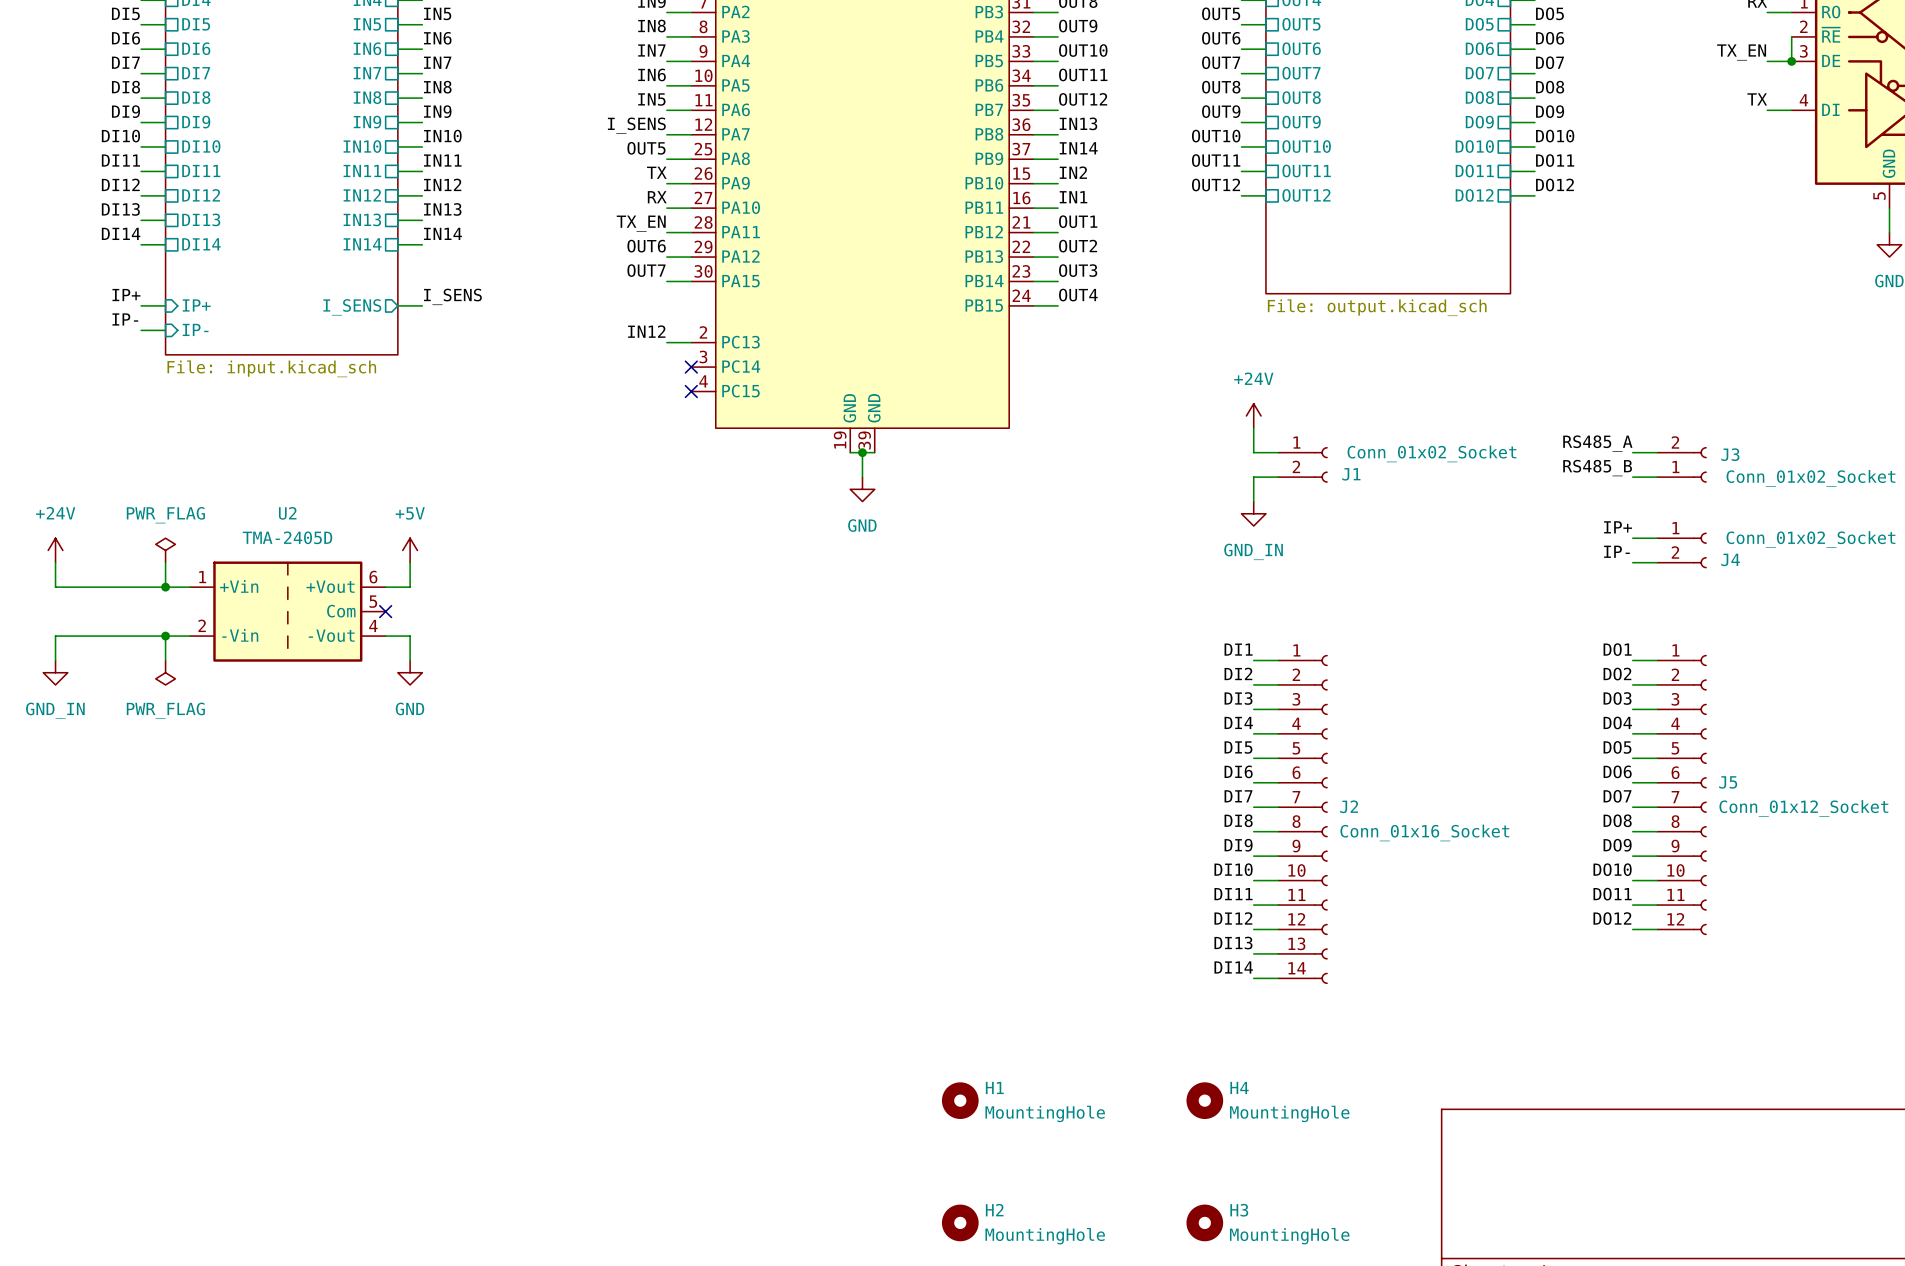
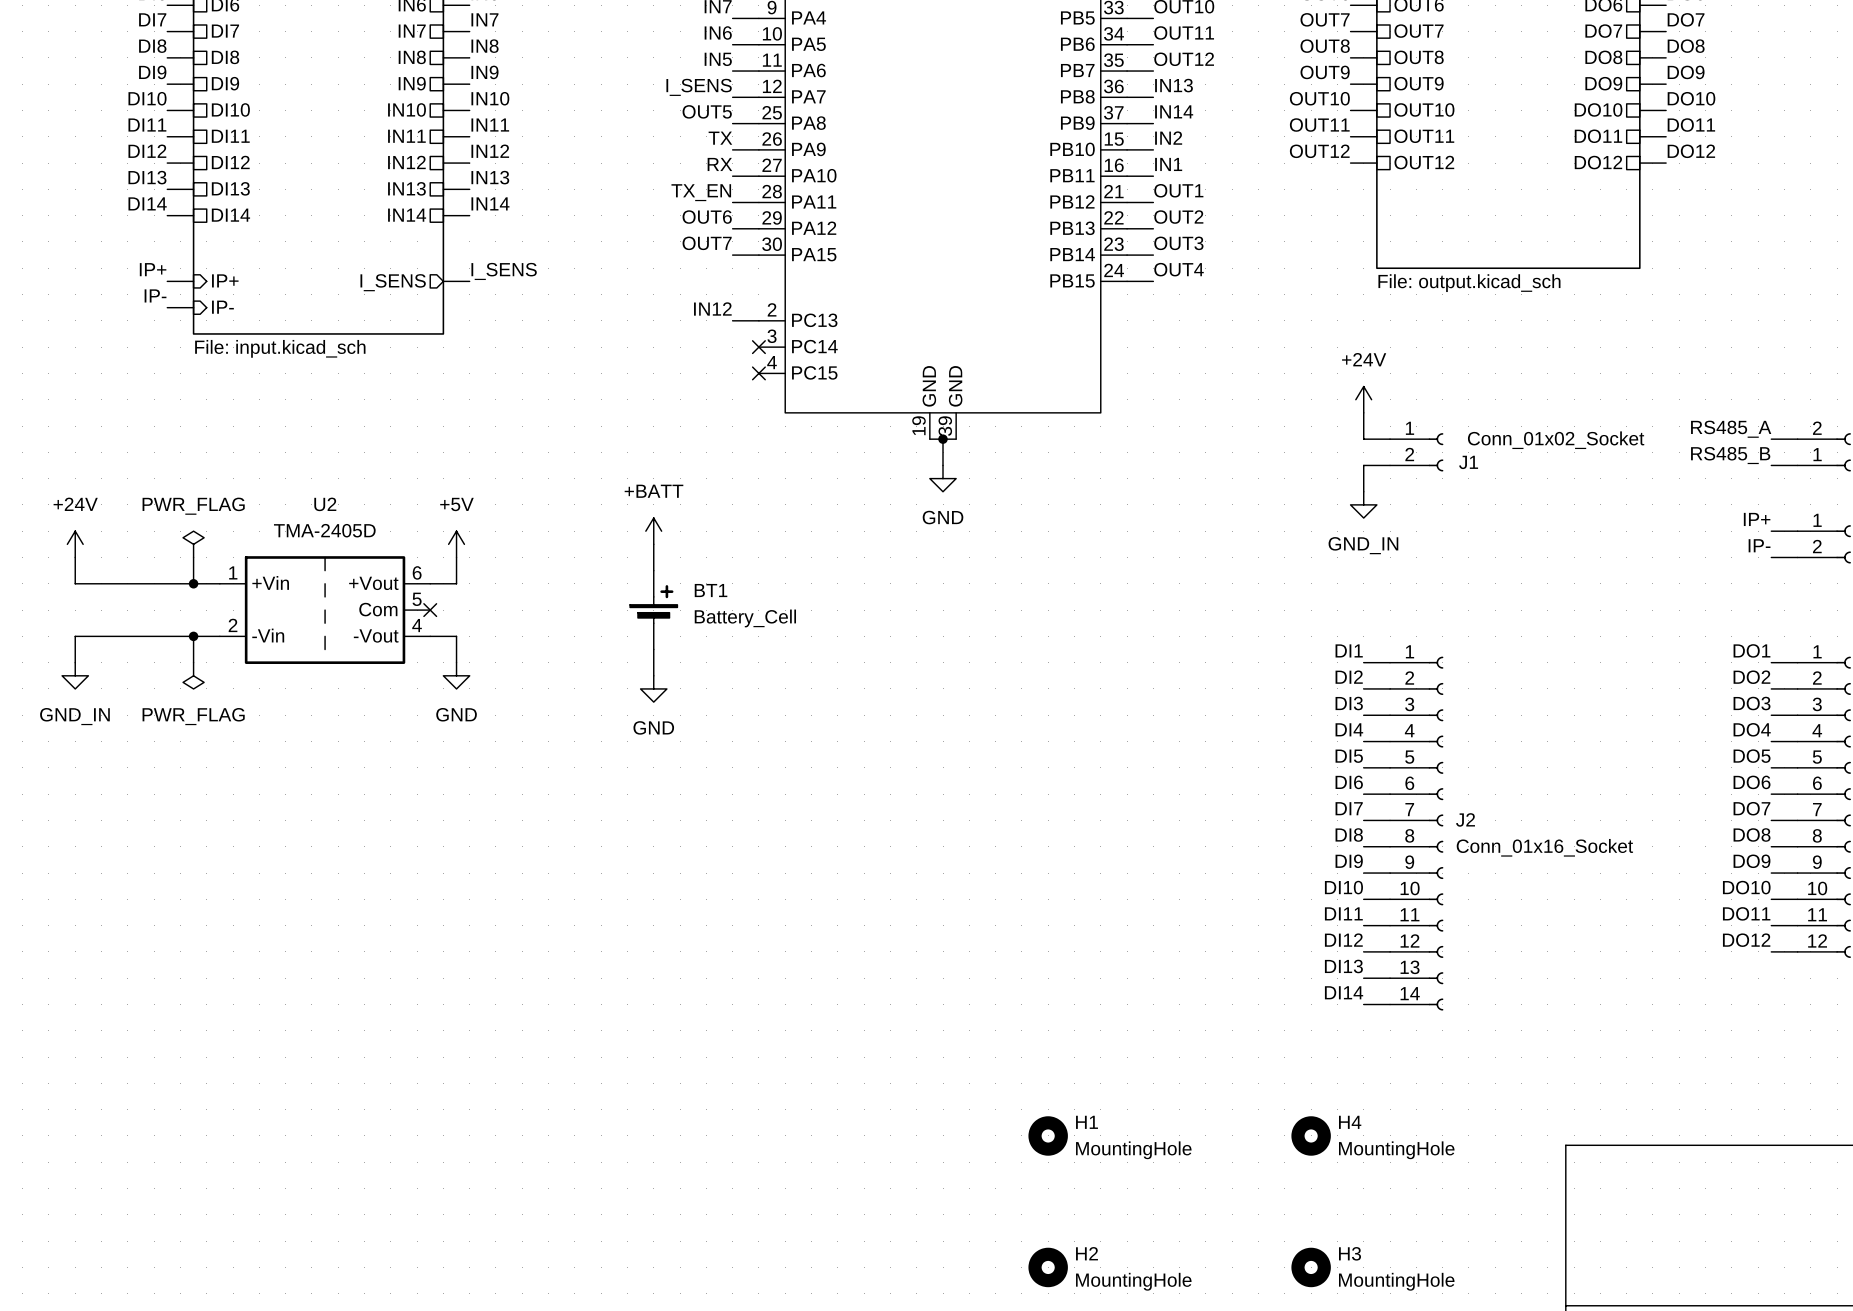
power symbol: none -> +BATT (653, 531)
wire: none -> (653, 544) (653, 570)
BT1: none -> Battery_Cell (653, 610)
wire: none -> (653, 649) (653, 675)
power symbol: none -> GND (653, 688)

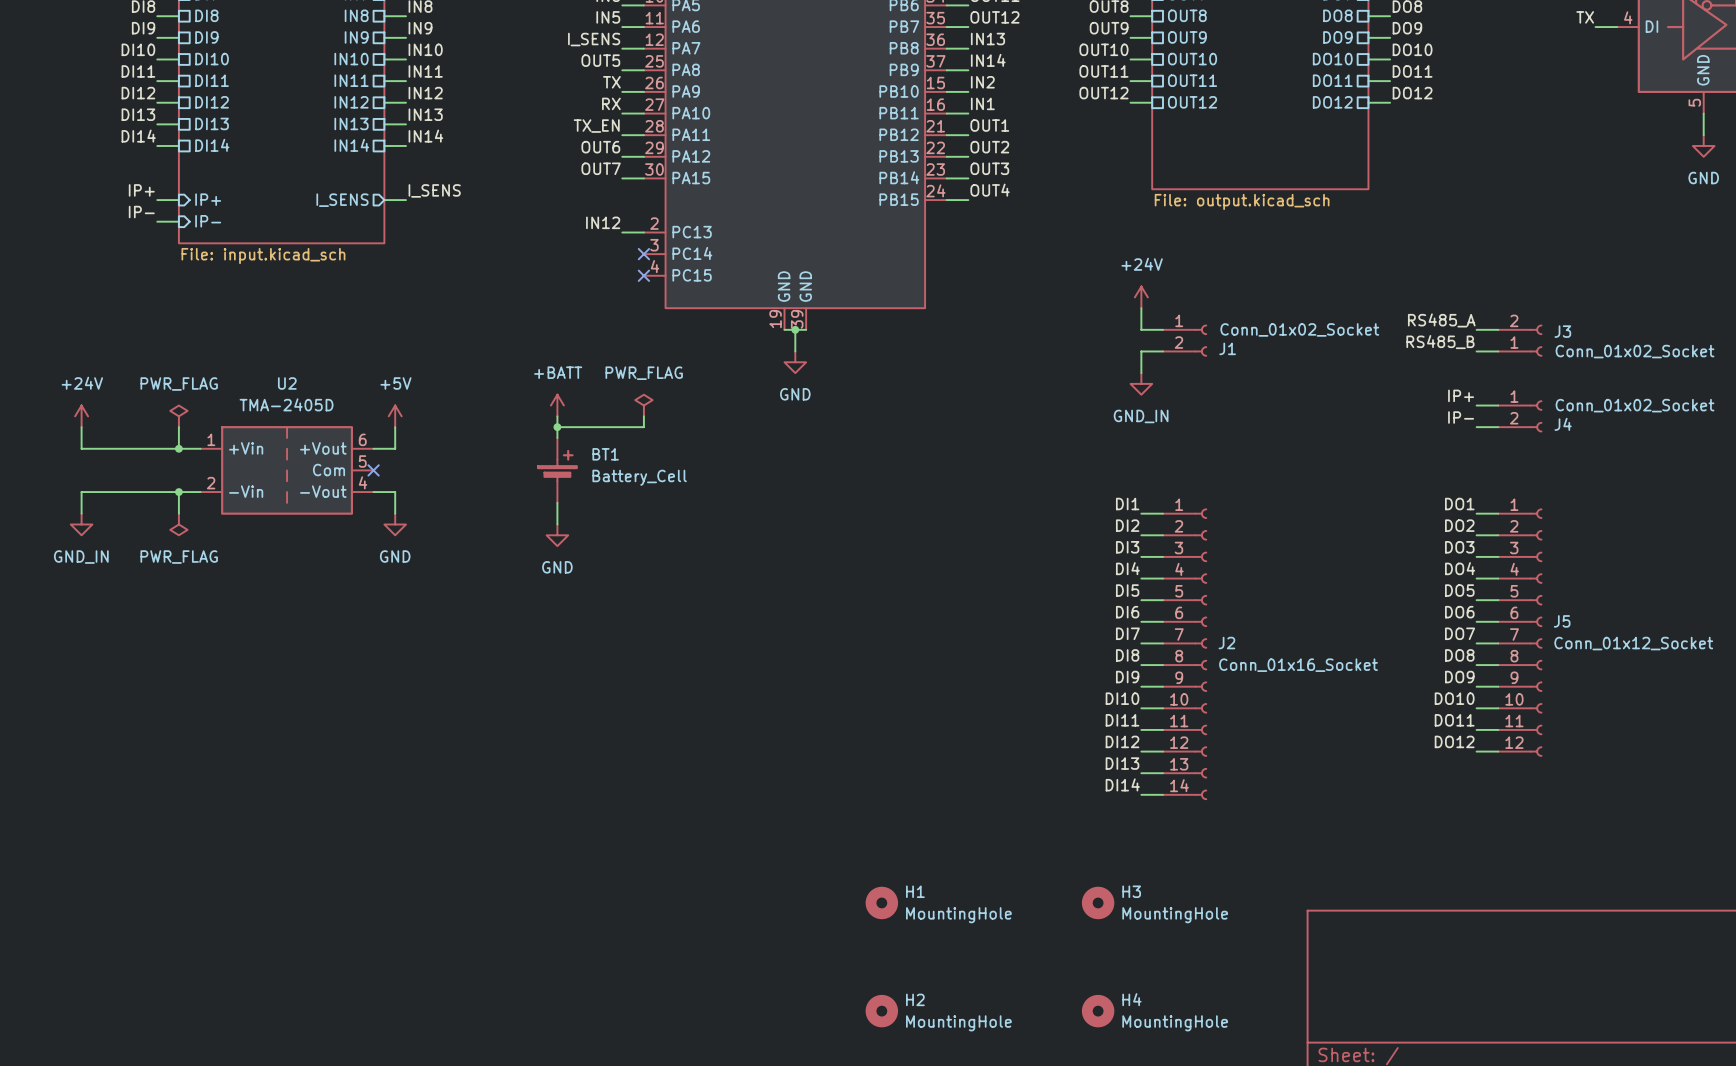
power symbol: none -> PWR_FLAG (643, 405)
wire: none -> (643, 416) (643, 427) (557, 427)
junction: none -> (557, 427)
H4 name: H4 (1350, 1122) -> H3 (1131, 891)
H3 name: H3 (1350, 1253) -> H4 (1131, 999)

